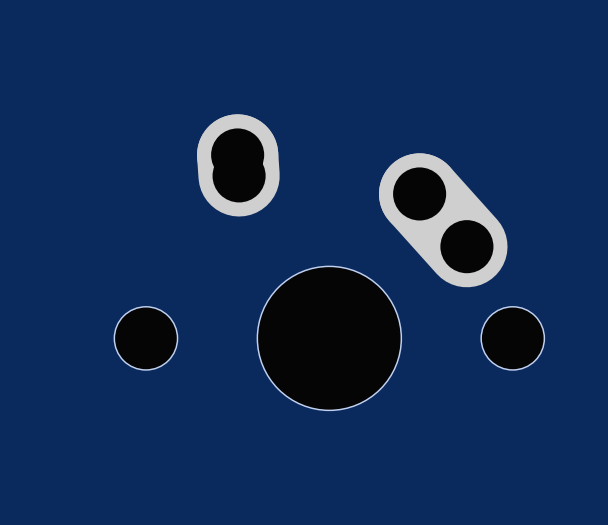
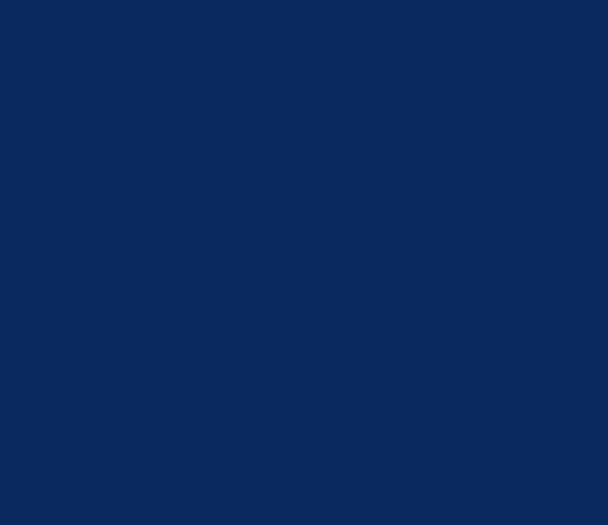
part: (329, 262) -> none

